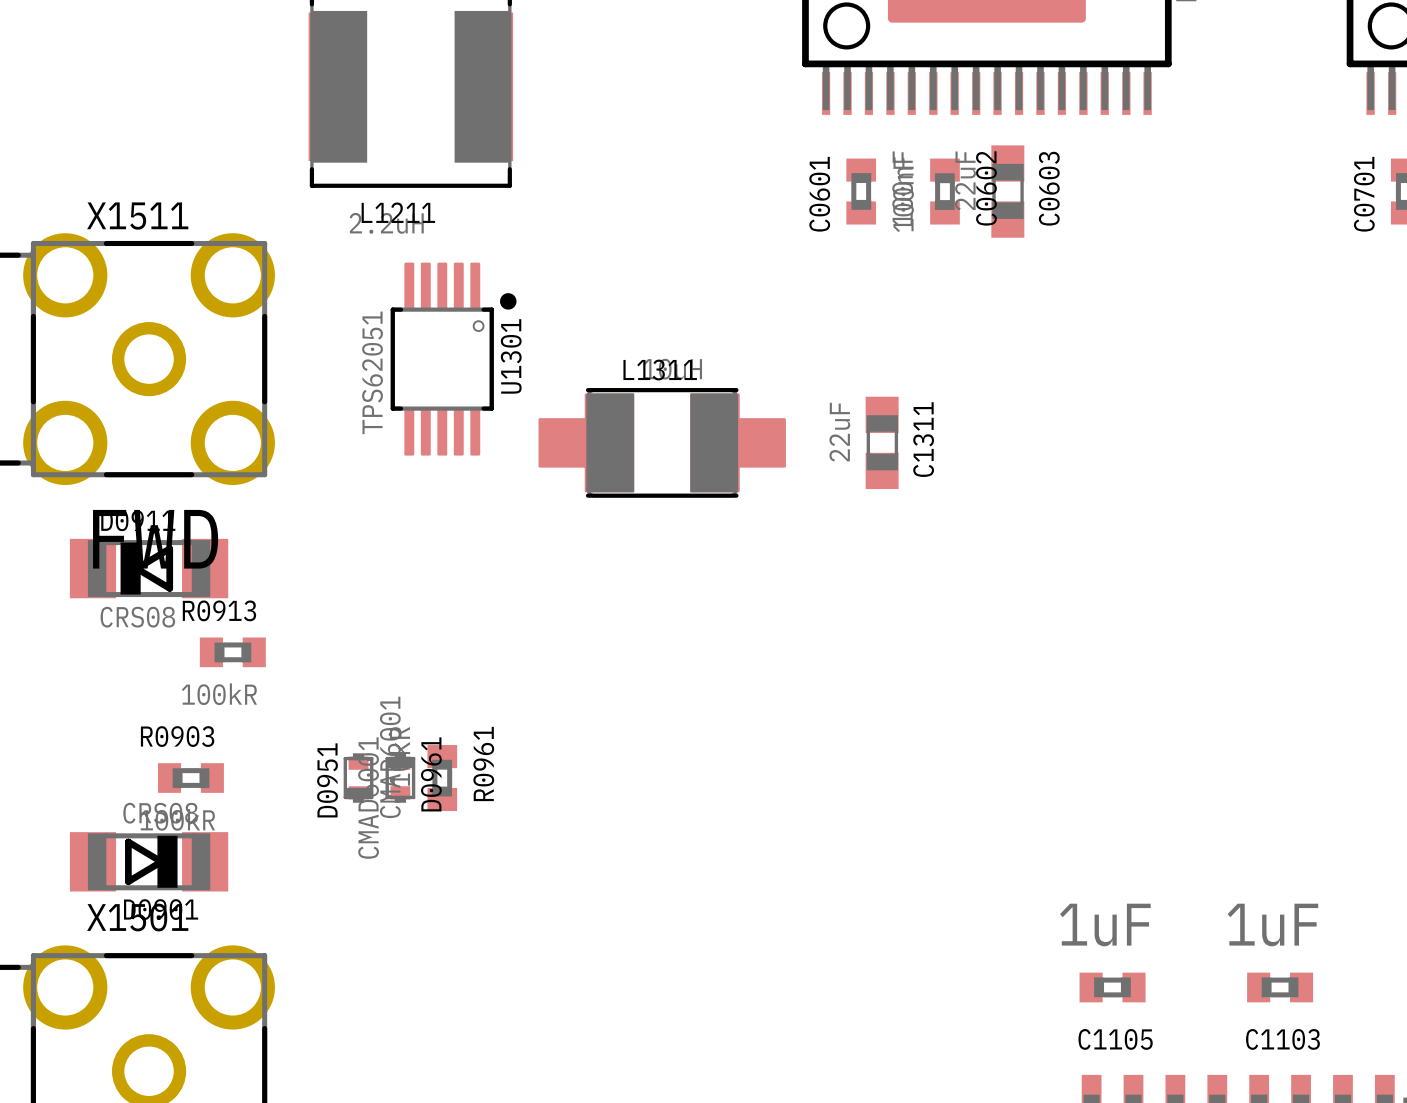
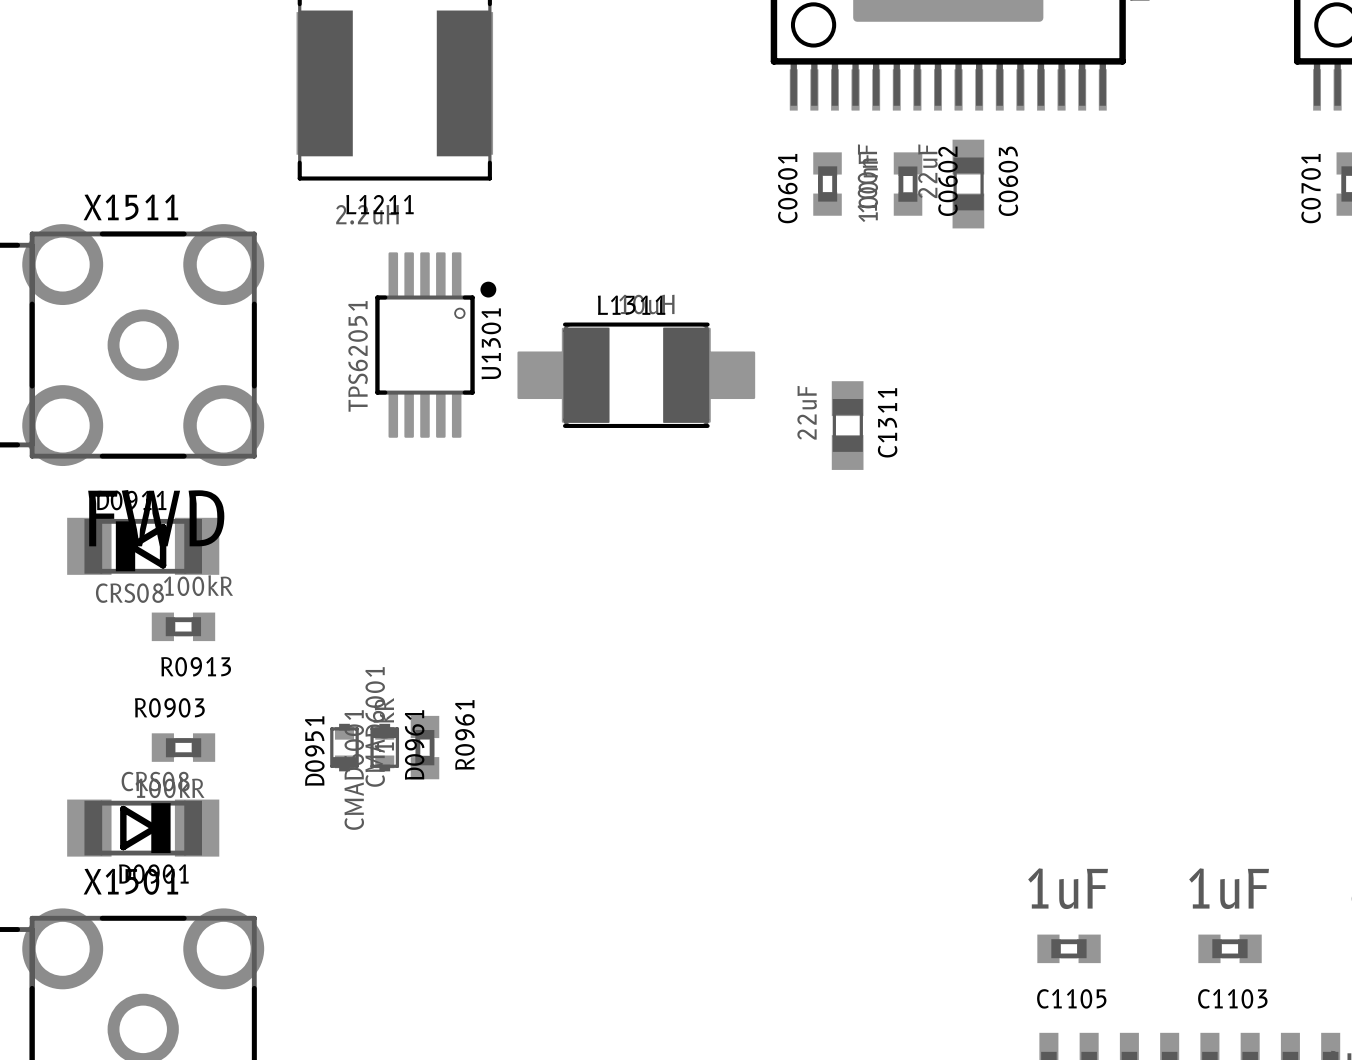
L1311 position: (662, 442) -> (636, 375)
R0913 name position: R0913 (219, 610) -> R0913 (196, 666)
R0913 position: (232, 652) -> (183, 626)
R0913 value position: 100kR (219, 694) -> 100kR (198, 585)

